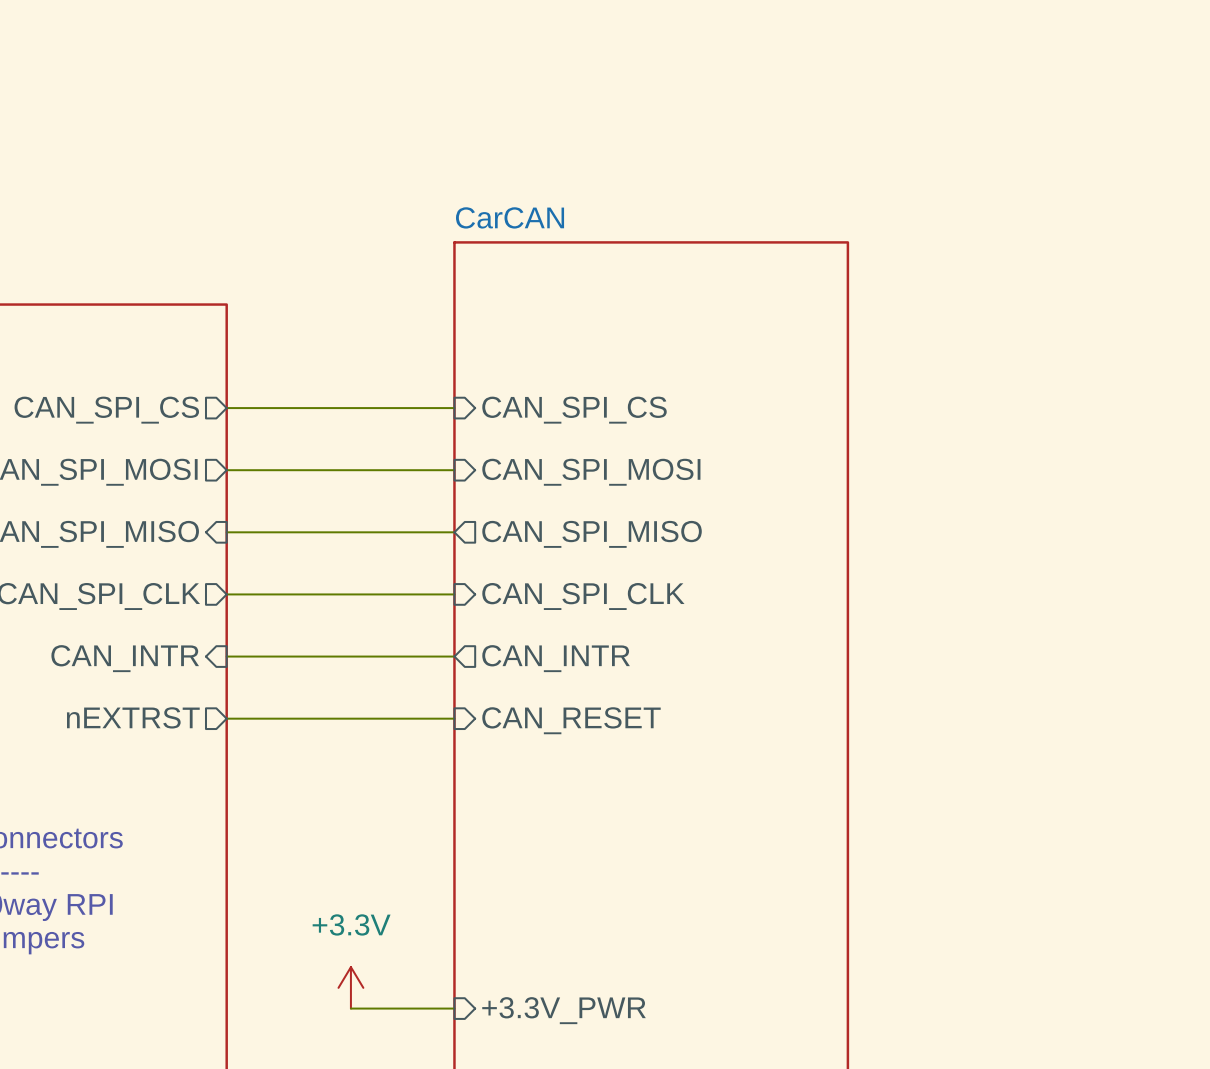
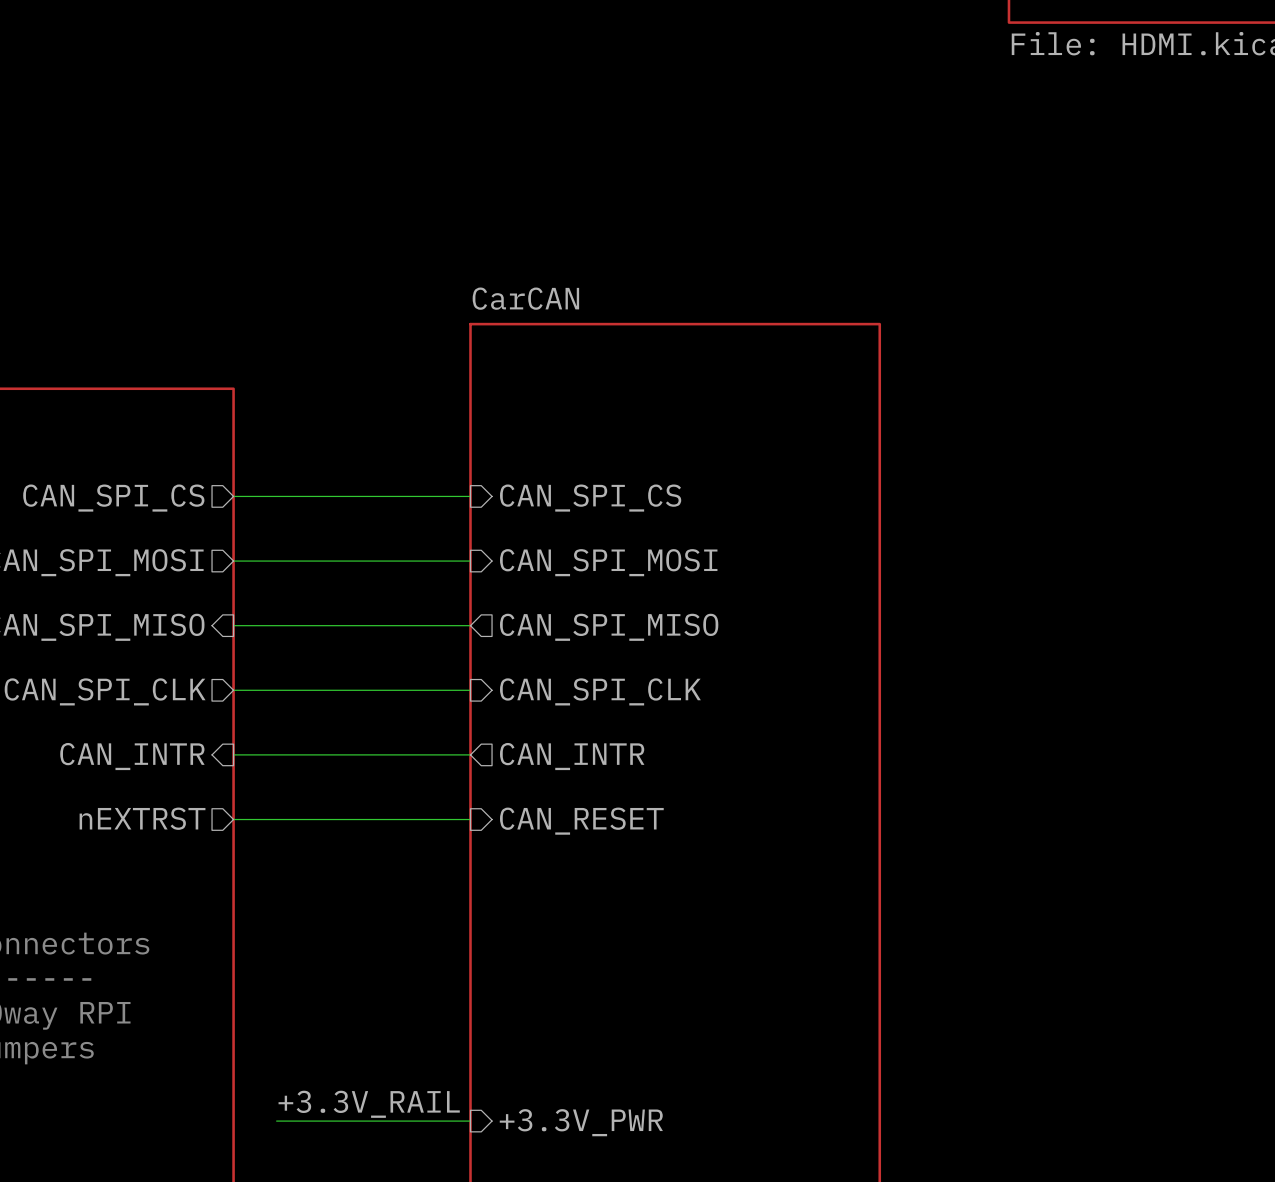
power symbol: +3.3V (350, 987) -> none
label: none -> +3.3V_RAIL (369, 1104)
wire: none -> (276, 1121) (362, 1121)

